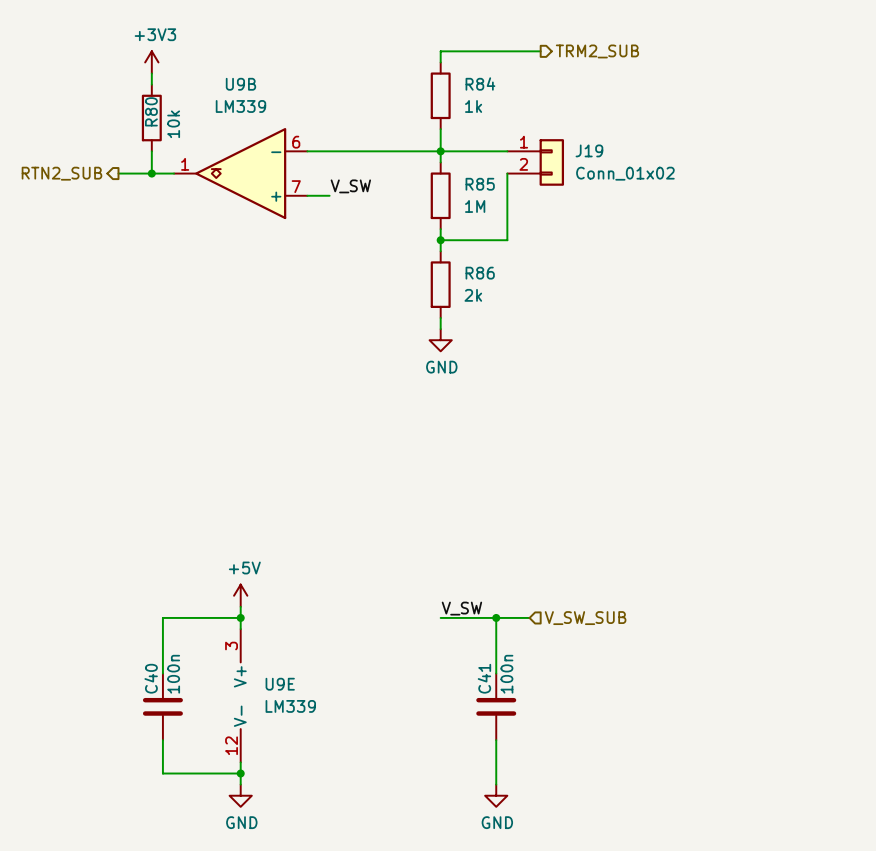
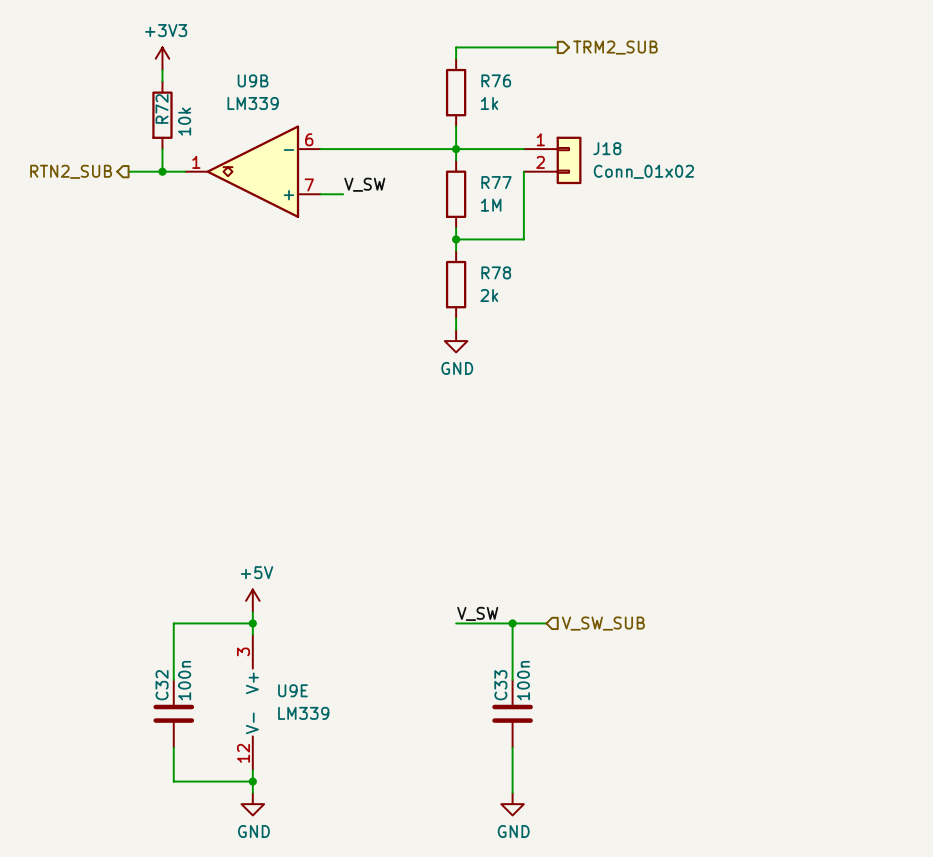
R84 name: R84 (480, 83) -> R76 (496, 80)
R80 name: R80 (151, 111) -> R72 (162, 108)
J19 name: J19 (589, 150) -> J18 (607, 148)
R85 name: R85 (480, 184) -> R77 (496, 182)
R86 name: R86 (480, 273) -> R78 (496, 272)
C40 name: C40 (151, 678) -> C32 (162, 685)
C41 name: C41 (484, 678) -> C33 (500, 685)

